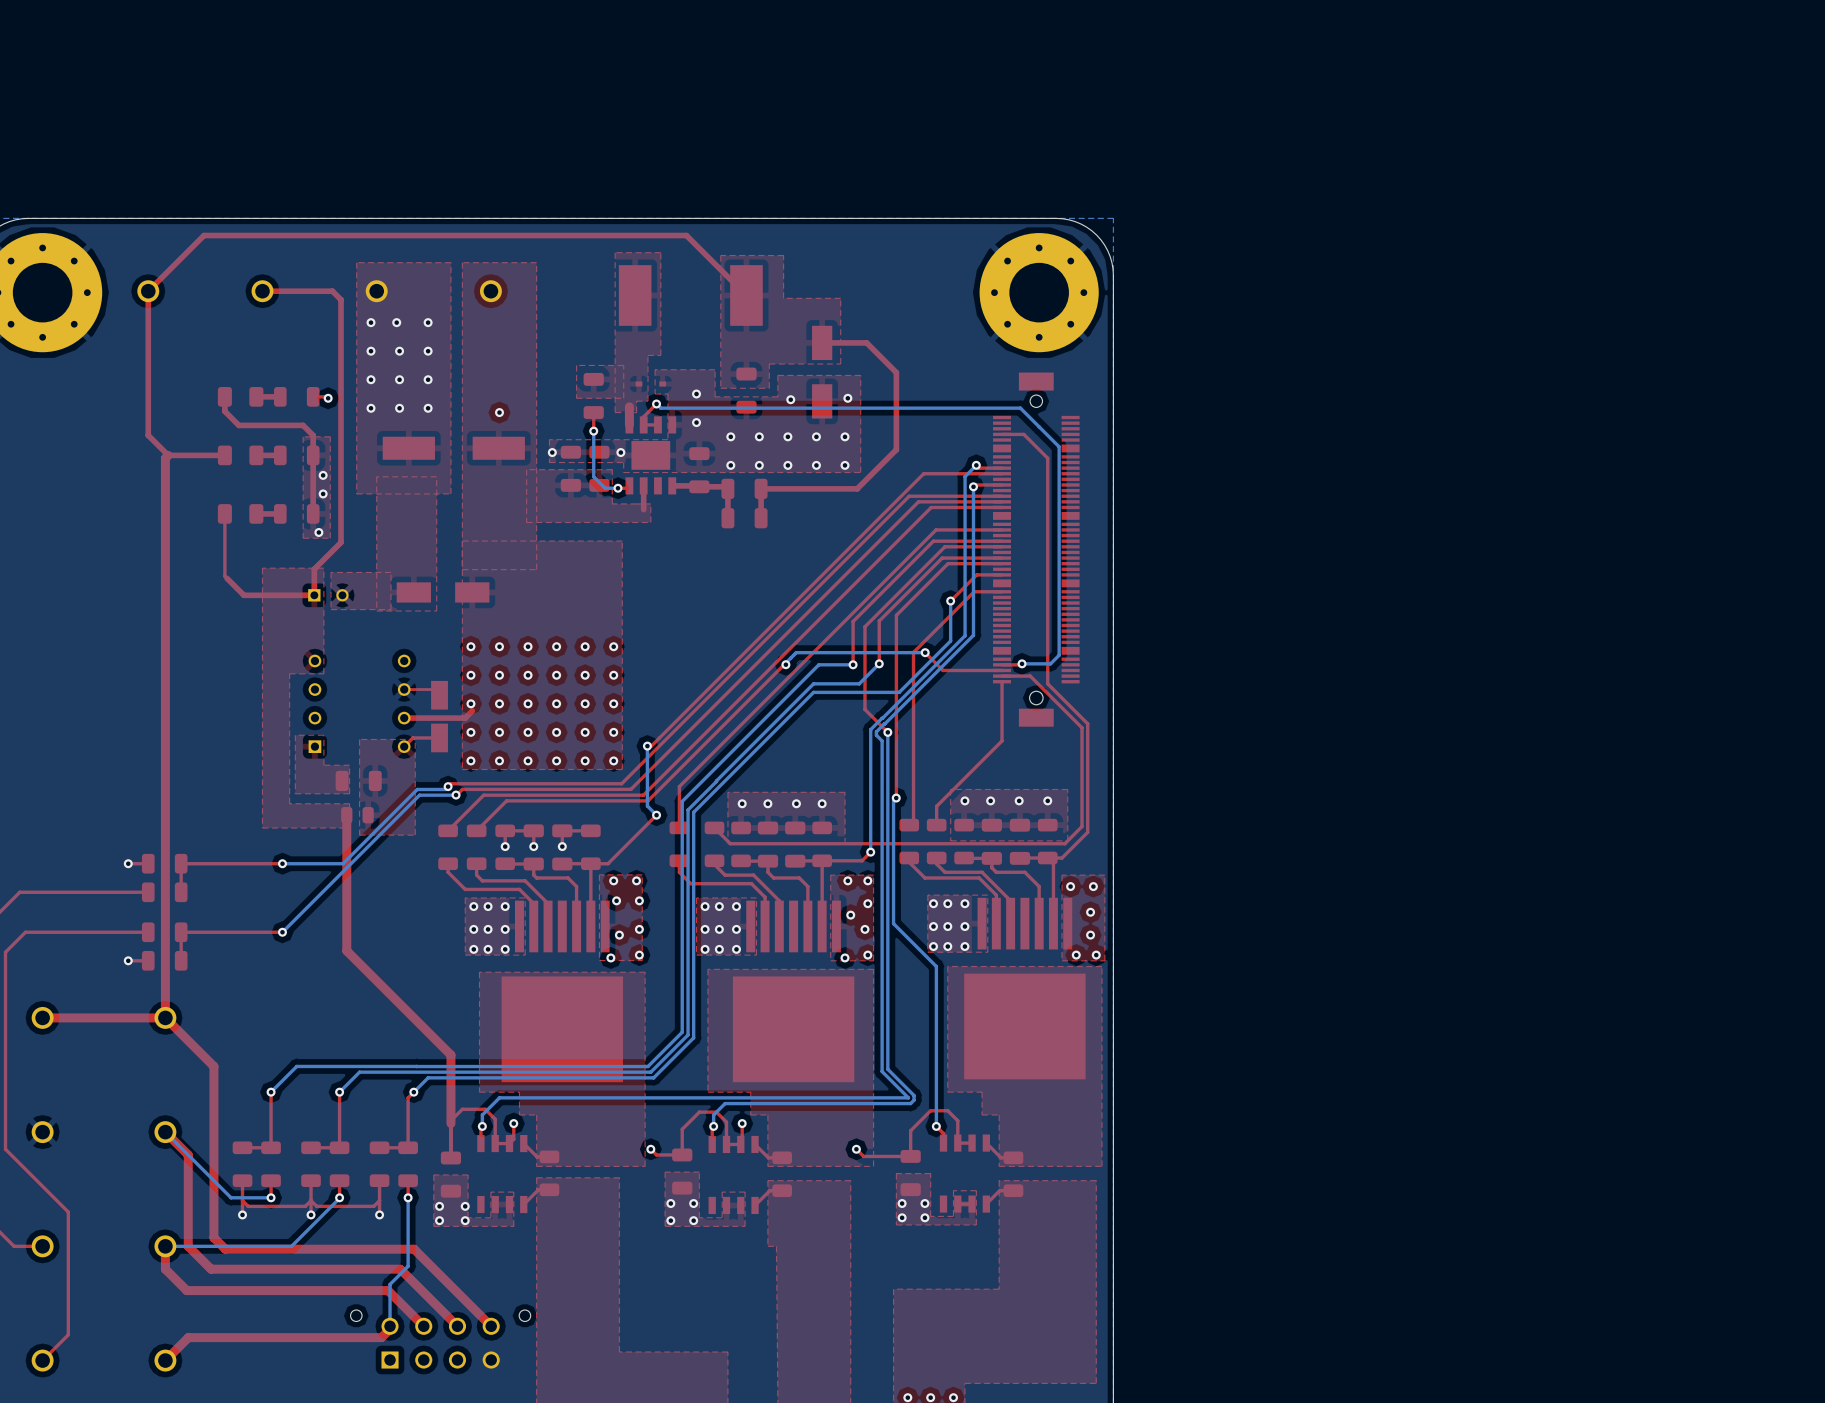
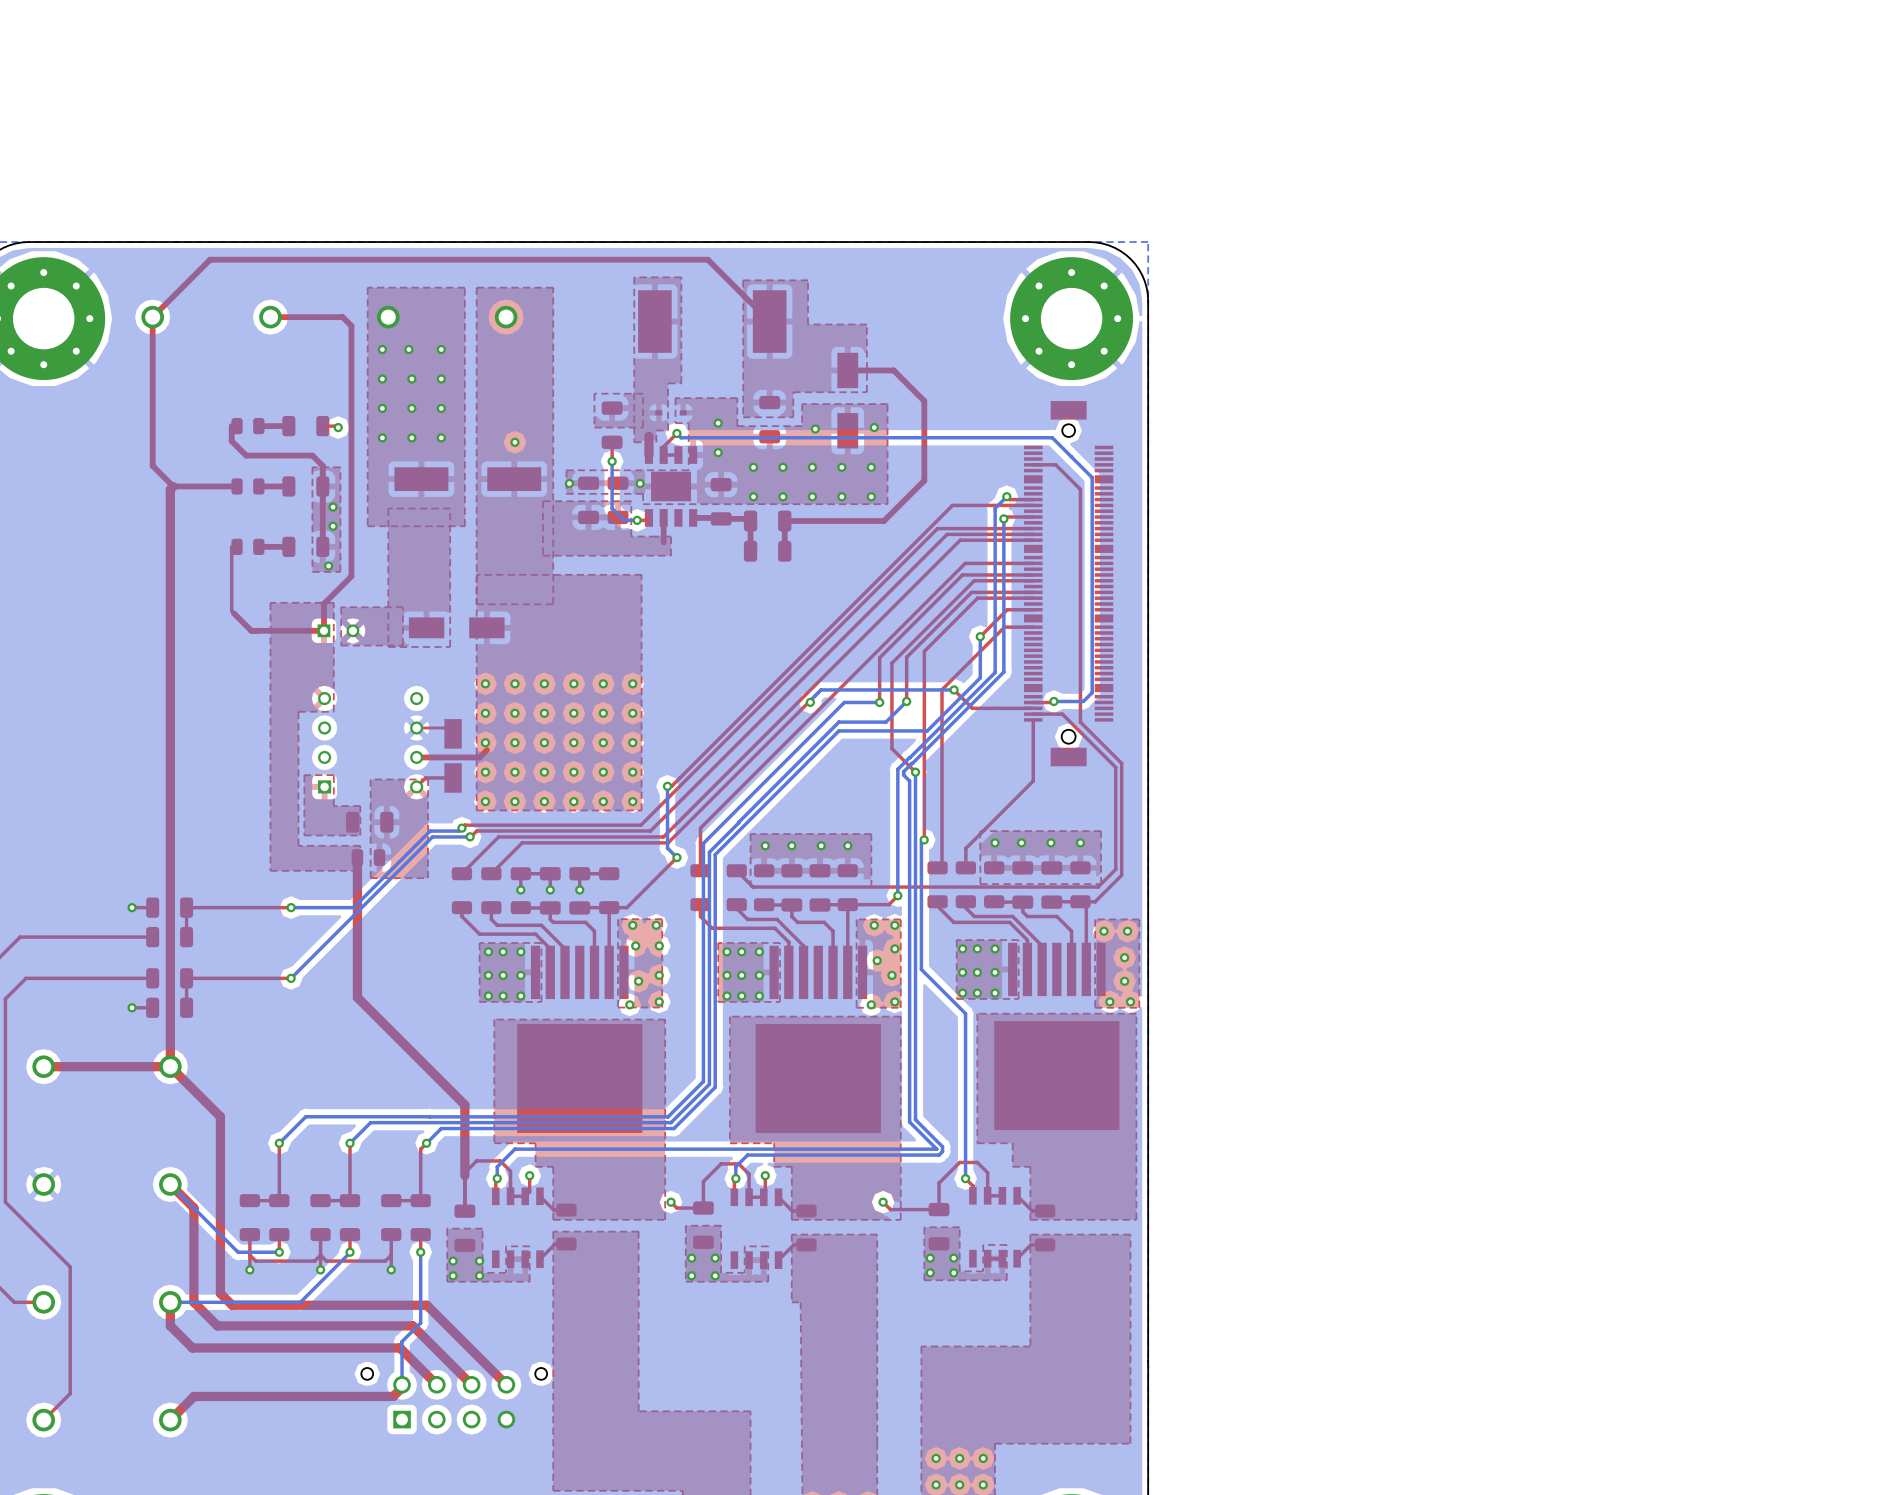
part footprint: [217, 387, 264, 407] -> [231, 417, 265, 435]
part footprint: [217, 445, 264, 466] -> [231, 478, 265, 495]
part footprint: [217, 504, 264, 524] -> [231, 538, 265, 555]

